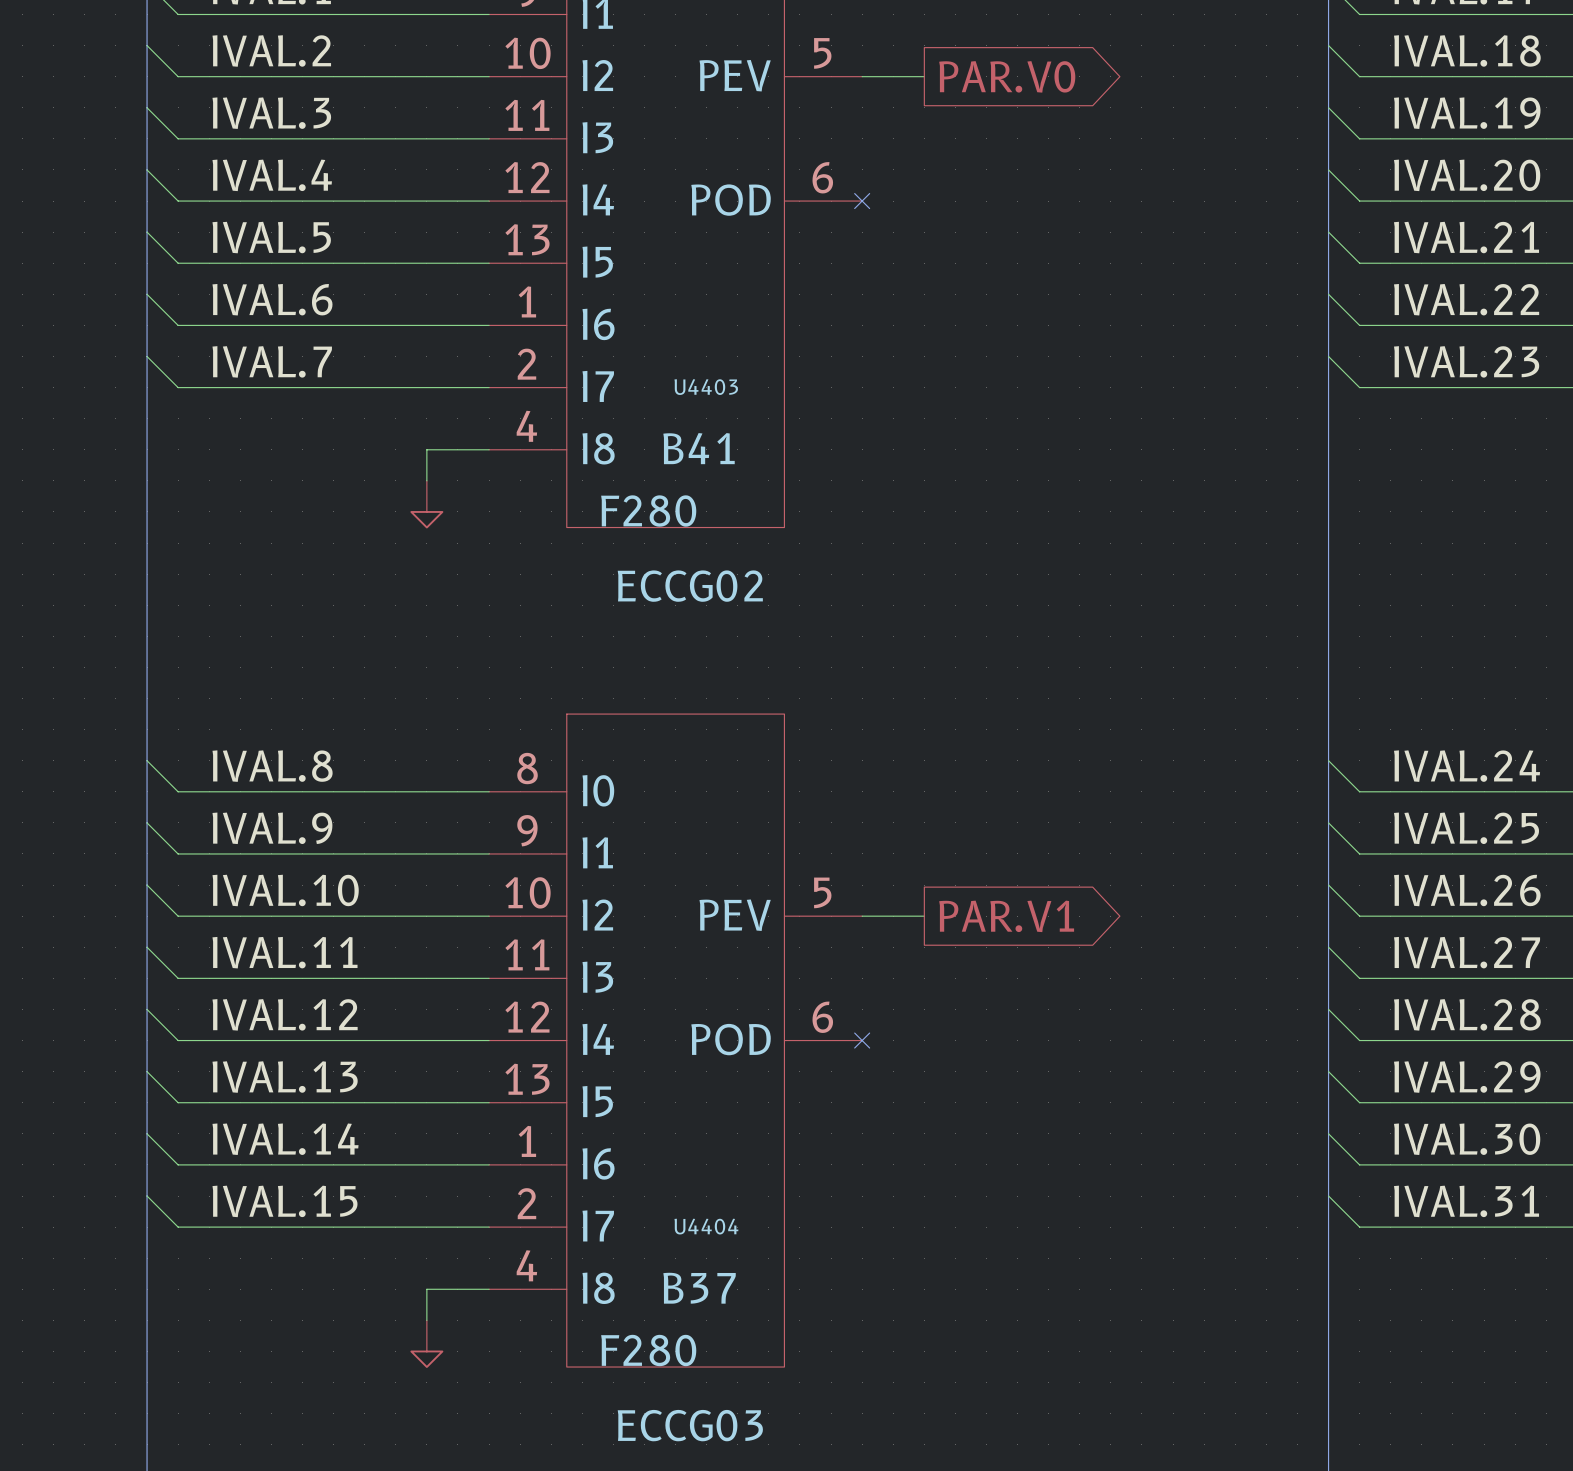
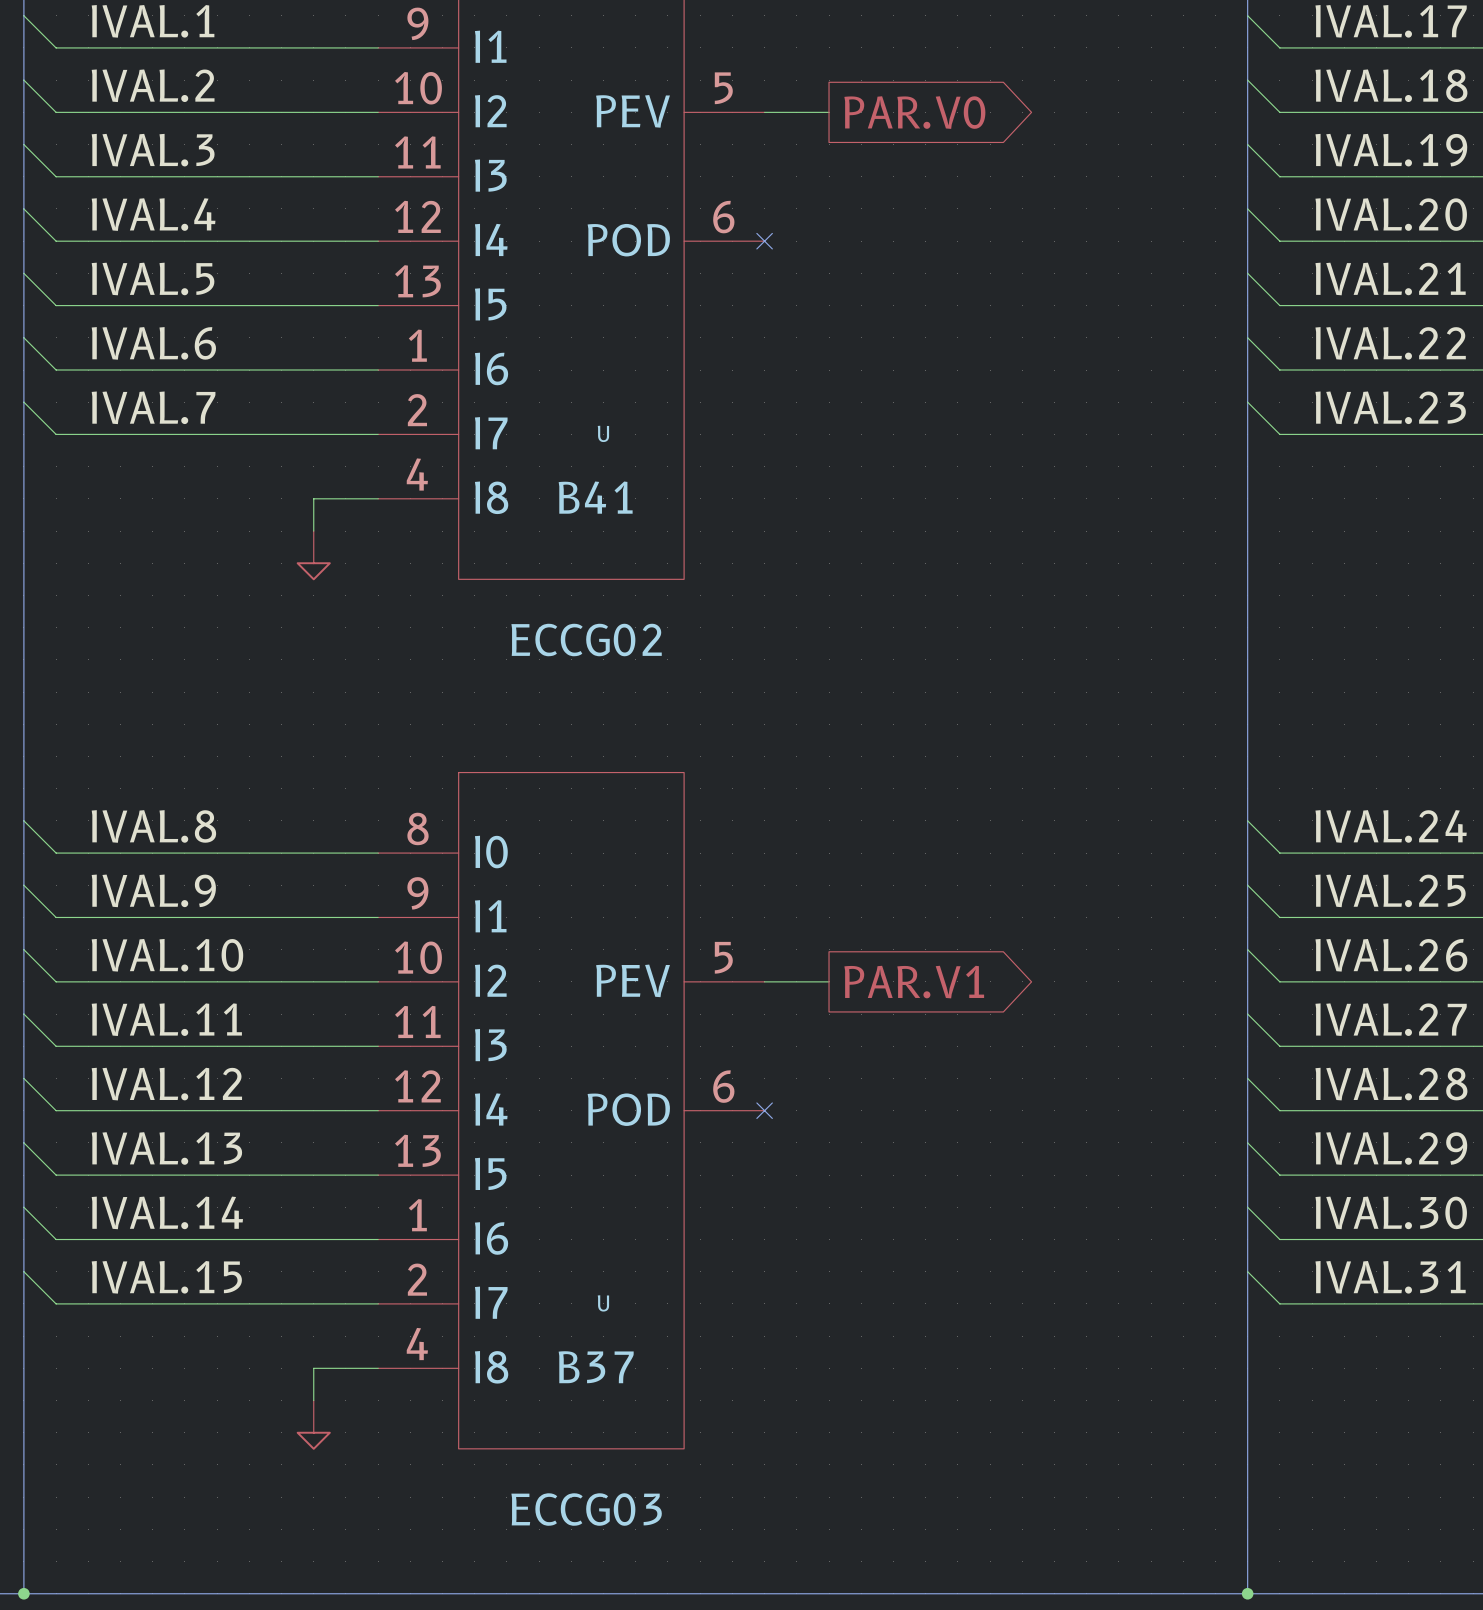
U4403 name: U4403 (706, 387) -> U (603, 433)
U4403 value: F280 (648, 511) -> none
U4404 name: U4404 (706, 1226) -> U (603, 1303)
U4404 value: F280 (648, 1350) -> none

